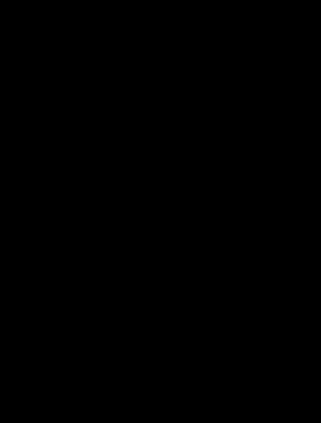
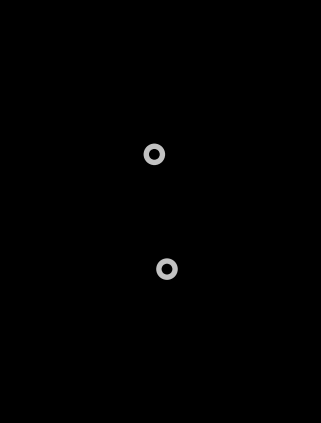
via: none -> (154, 154)
via: none -> (166, 269)

